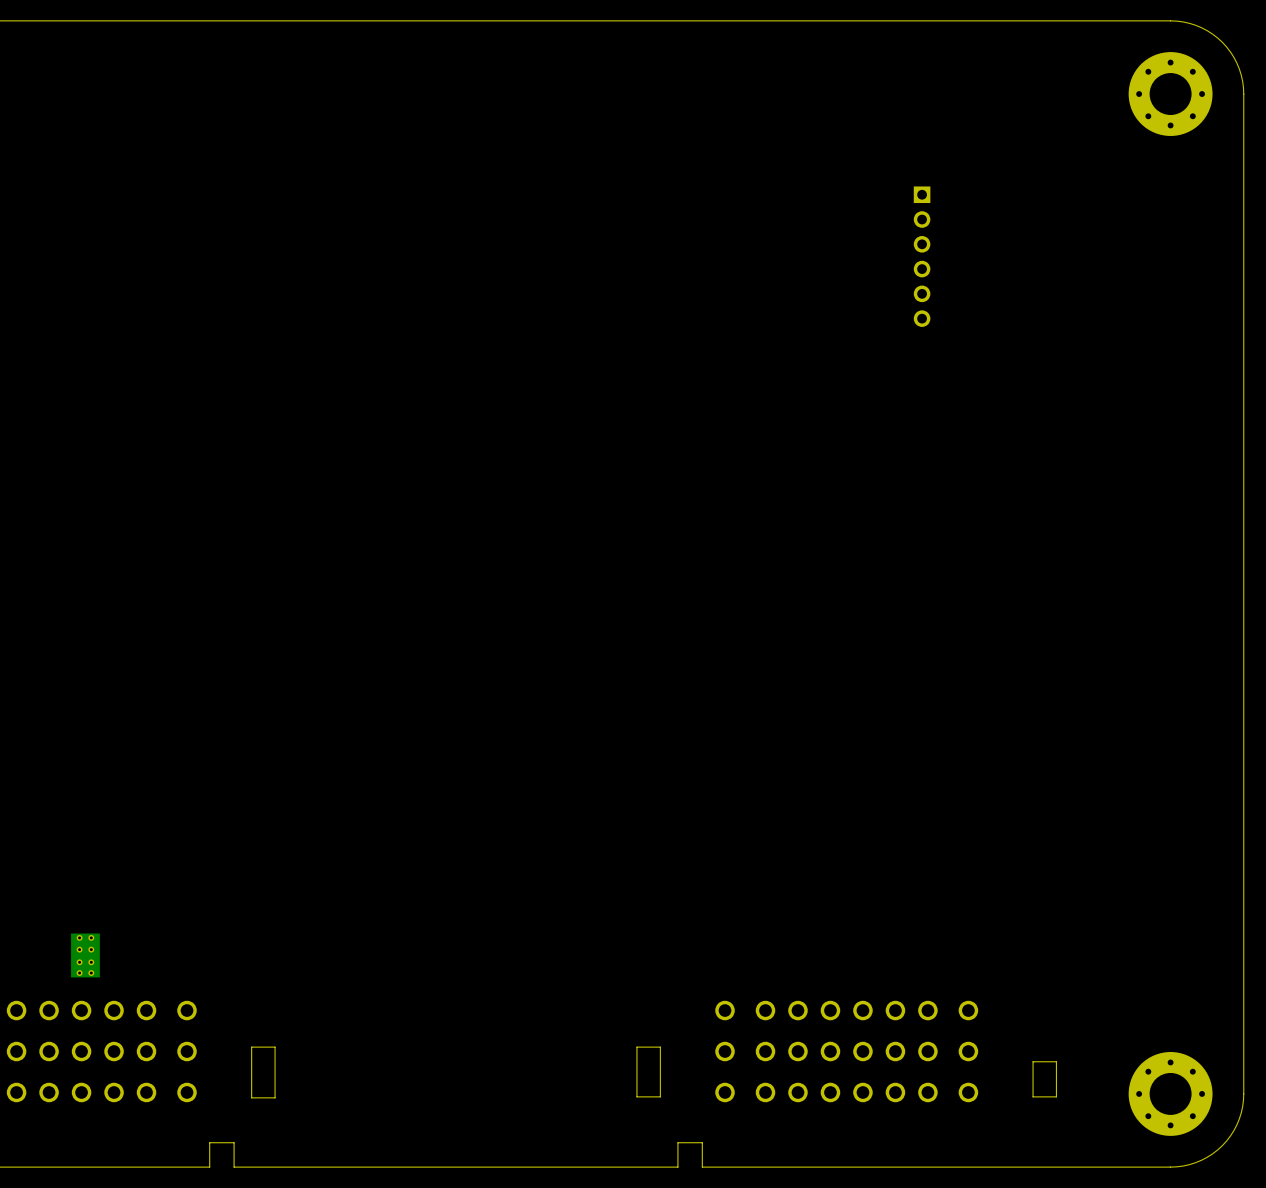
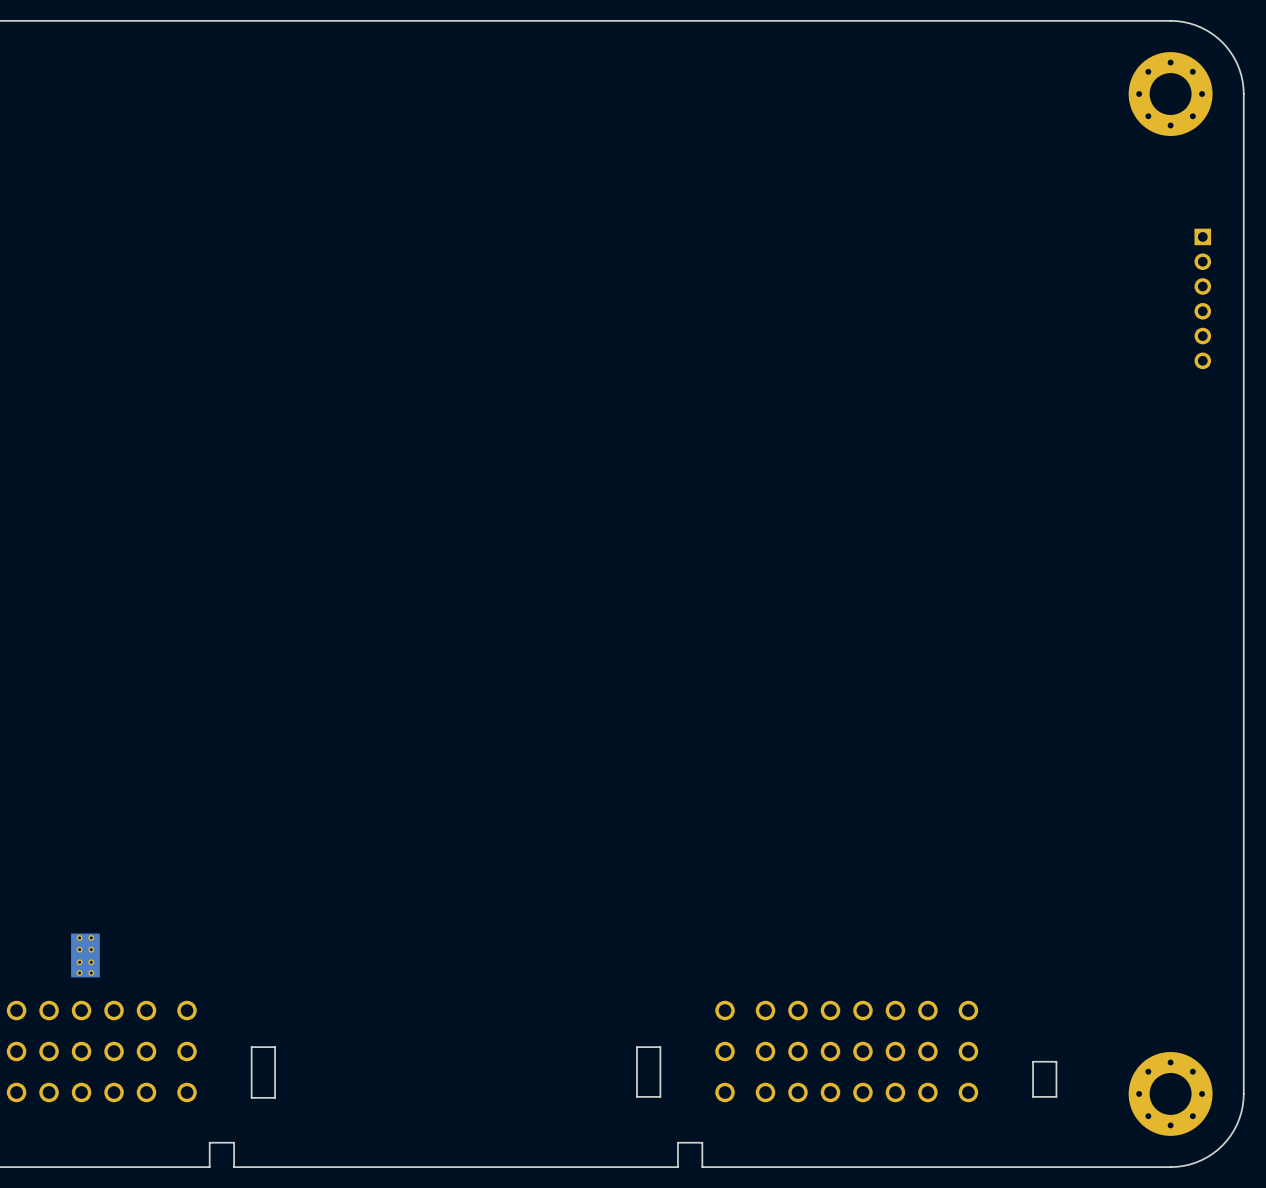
part: (922, 256) -> none
part: none -> (1202, 298)

